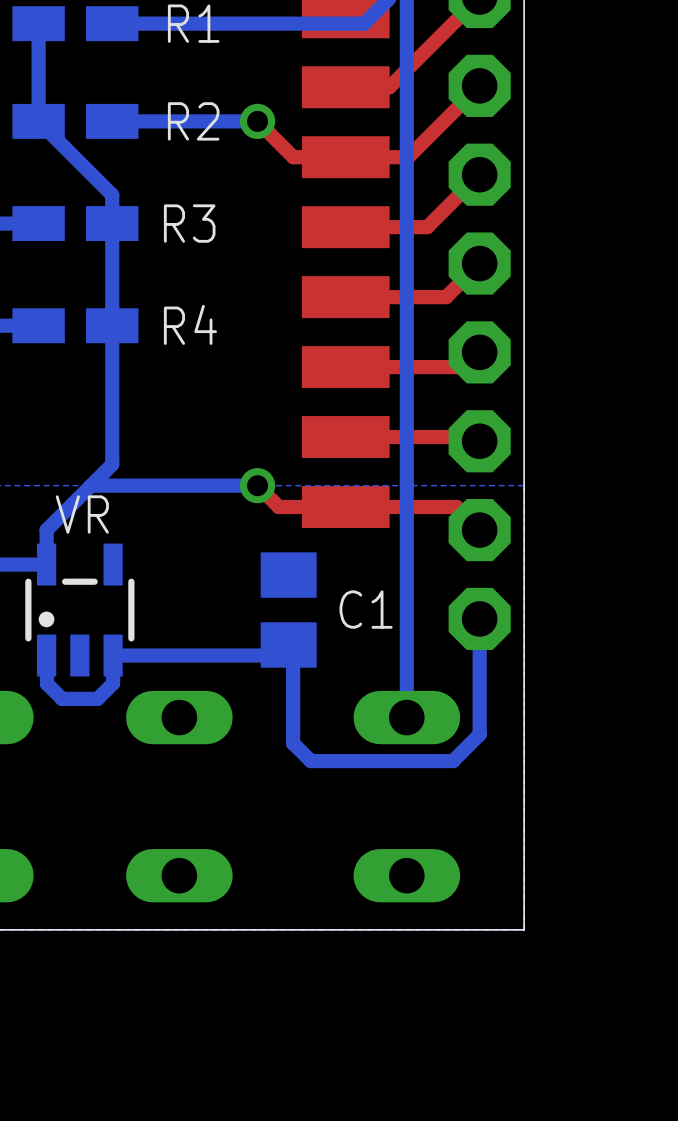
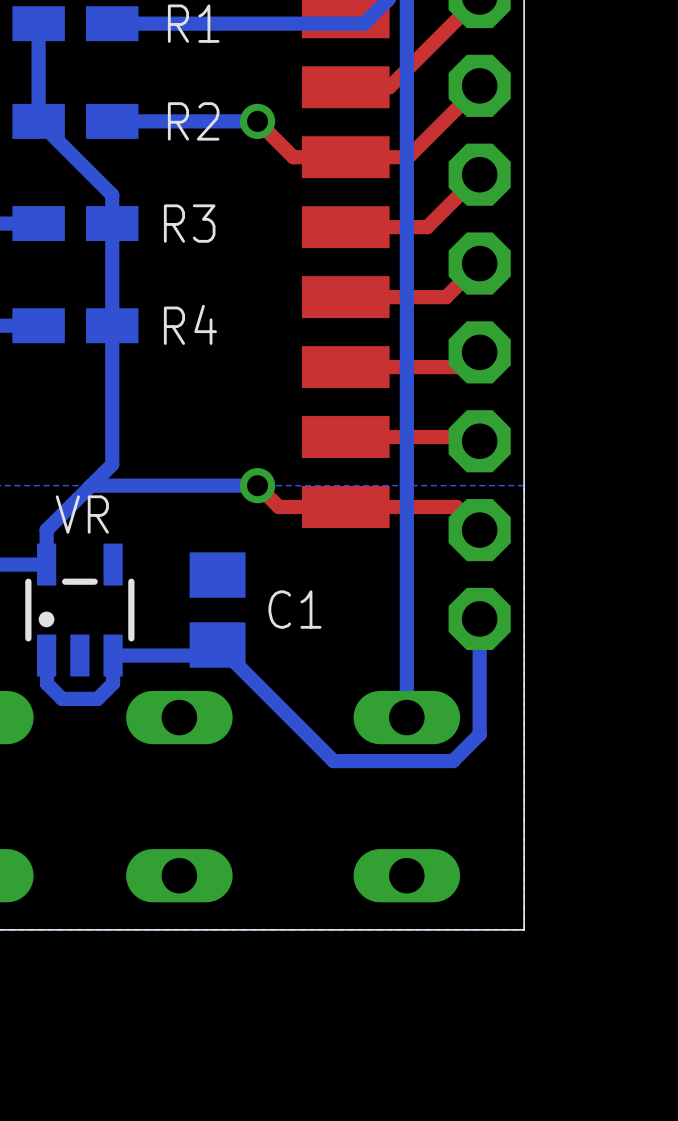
C1 position: (288, 610) -> (217, 610)
bottom track: (288, 645) (293, 649) (293, 743) (310, 761) (333, 761) -> (207, 655) (217, 645) (333, 761)
bottom track: (207, 655) (285, 655) (293, 663) -> none

